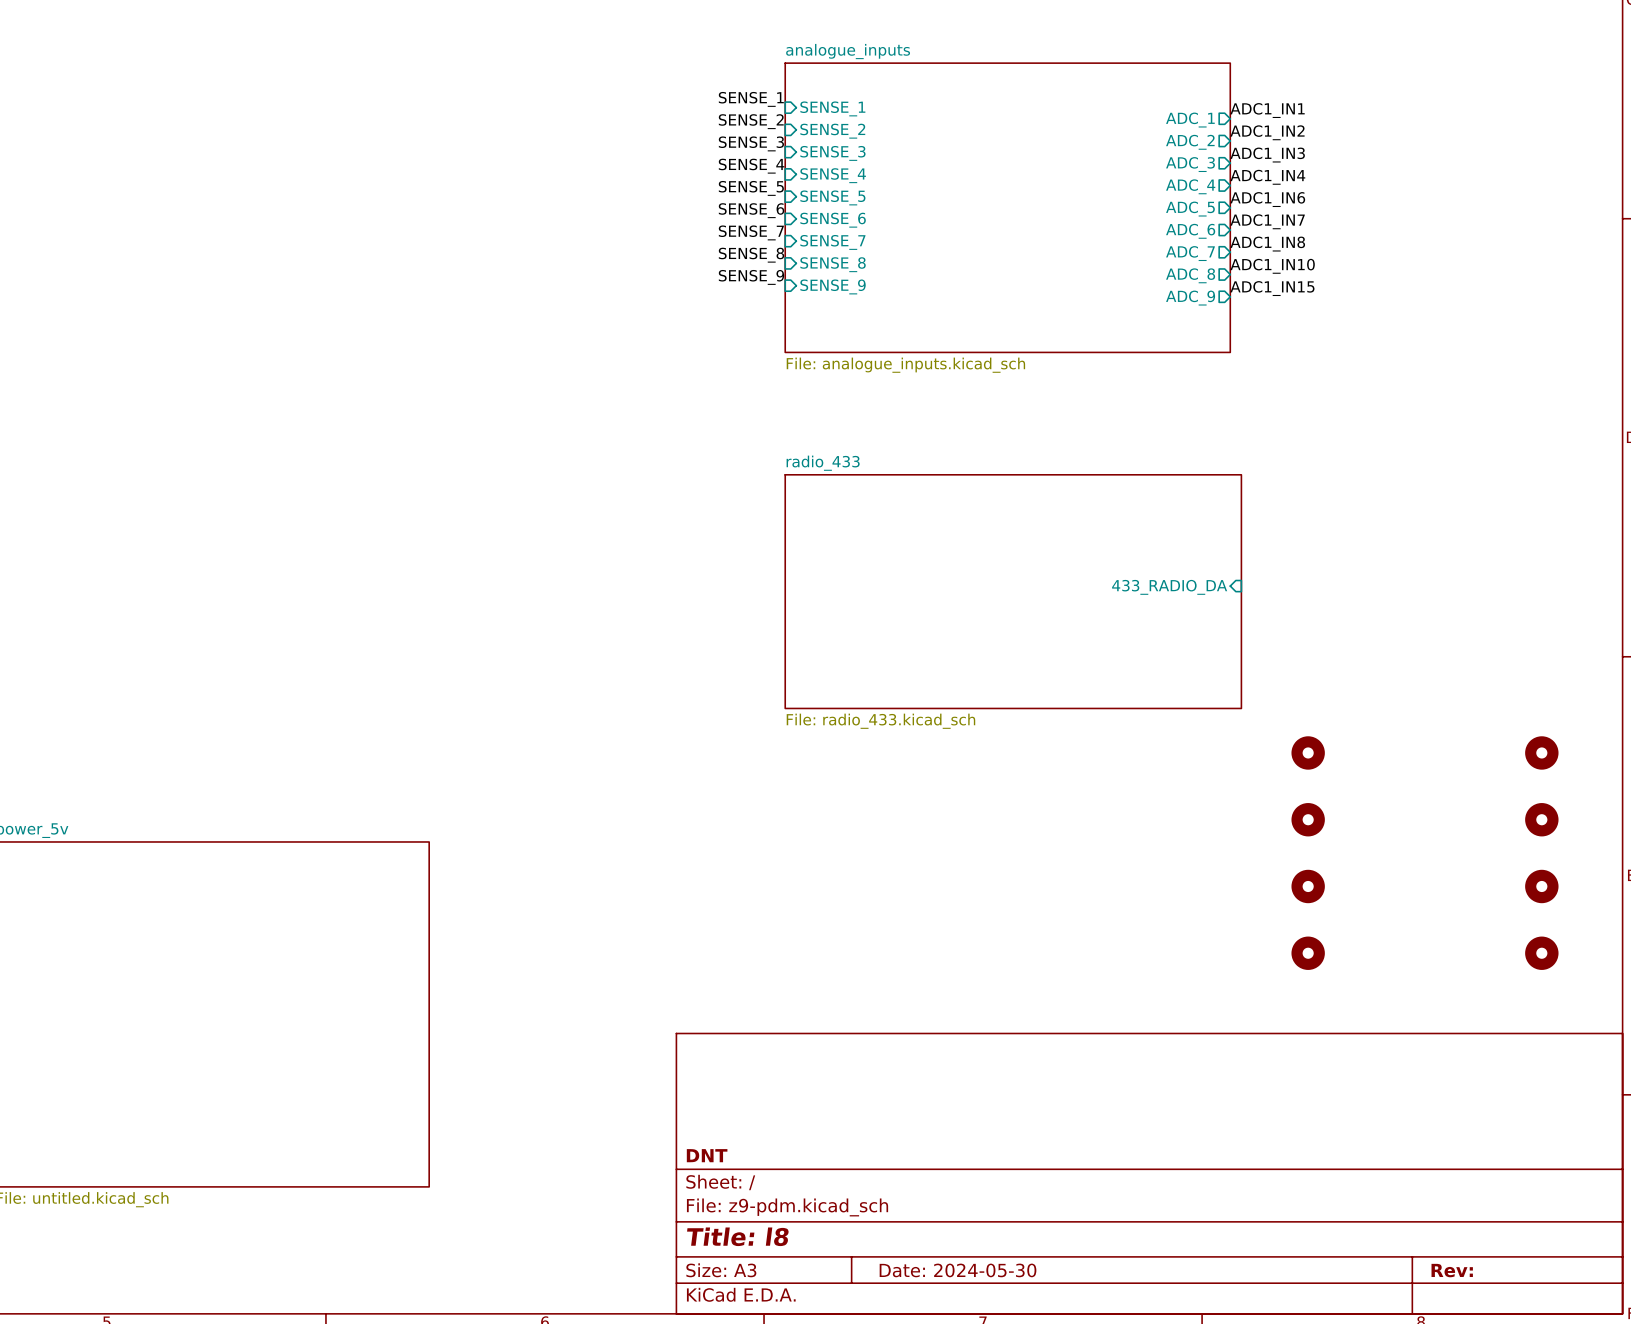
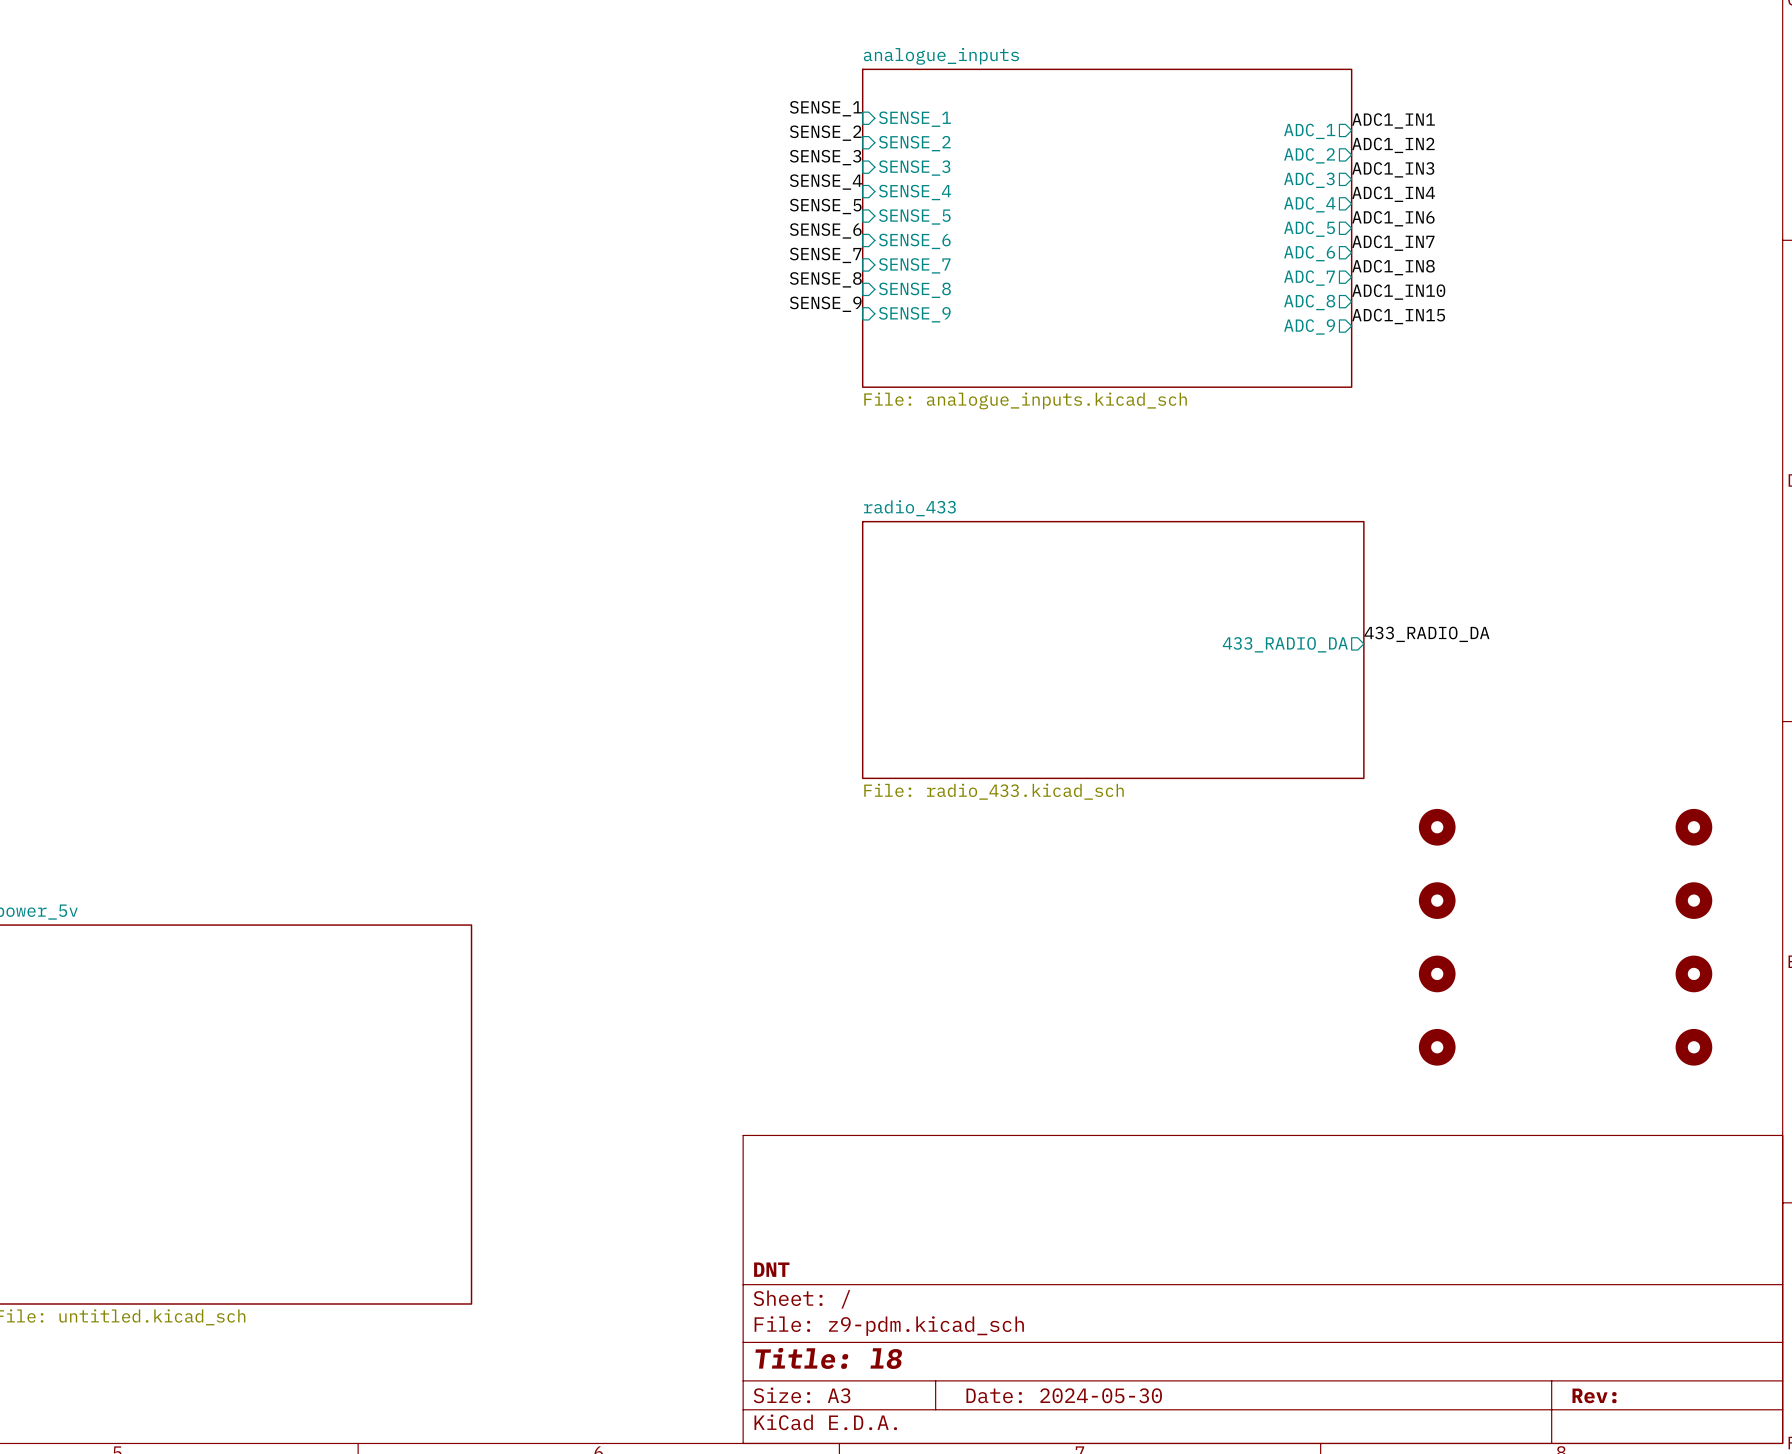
label: none -> 433_RADIO_DA (1426, 634)
sheet pin shape: input (1169, 587) -> output (1285, 644)

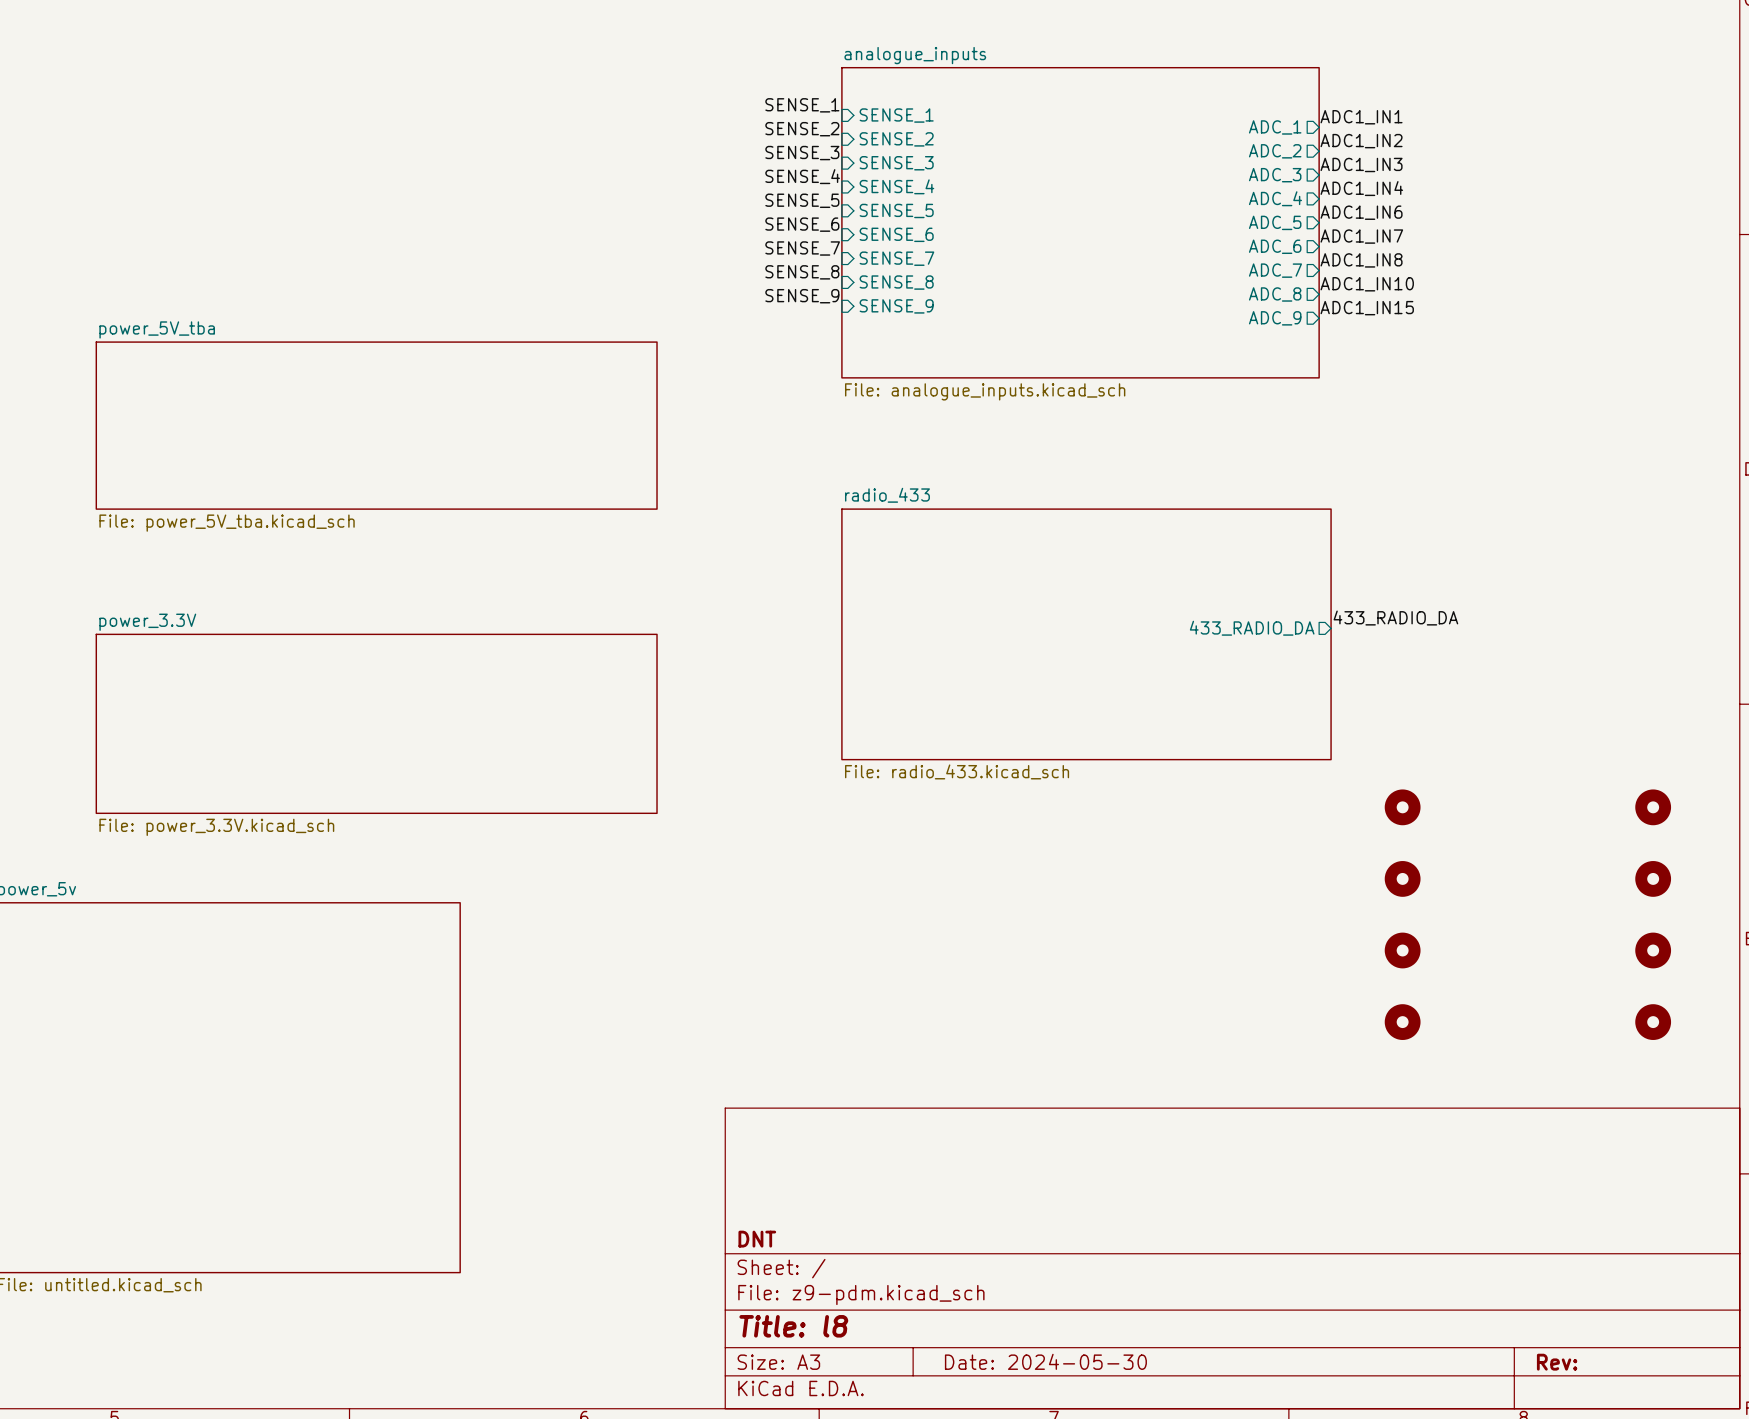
sheet power_5V_tba: none -> File: power_5V_tba.kicad_sch (376, 425)
sheet power_3.3V: none -> File: power_3.3V.kicad_sch (376, 723)

